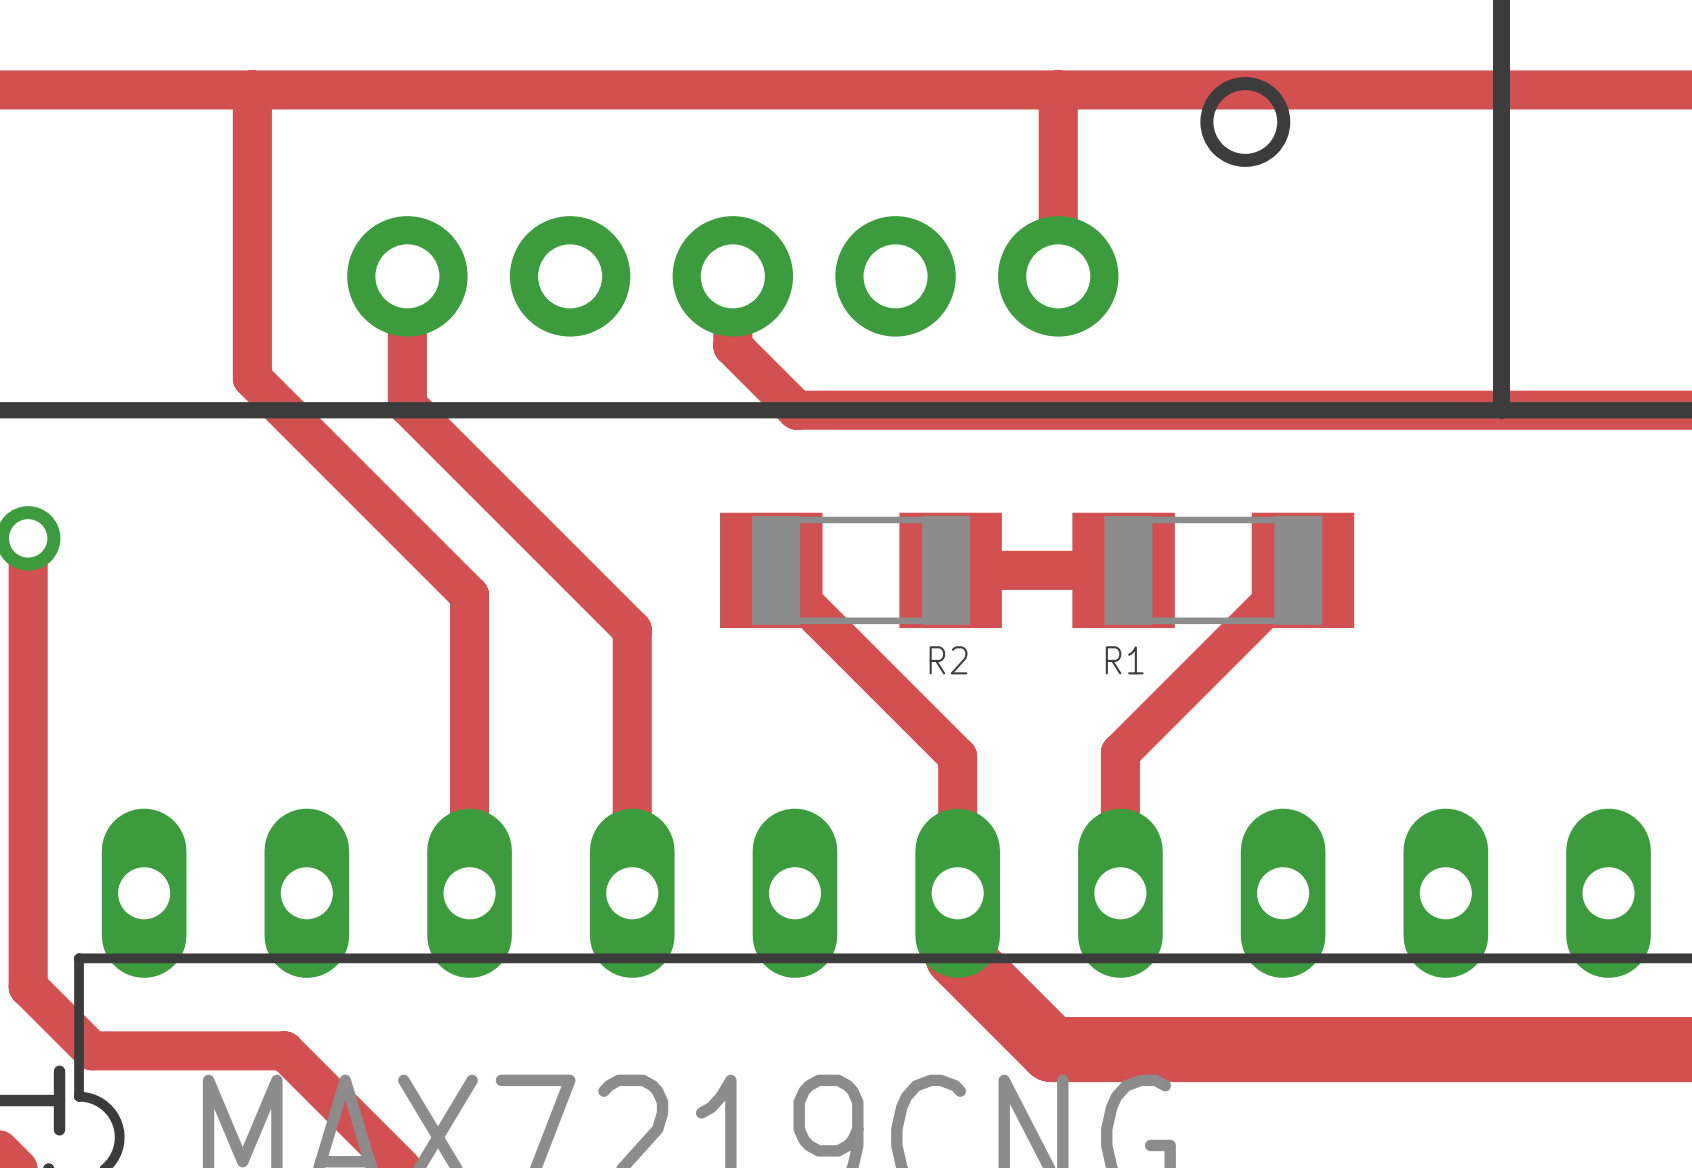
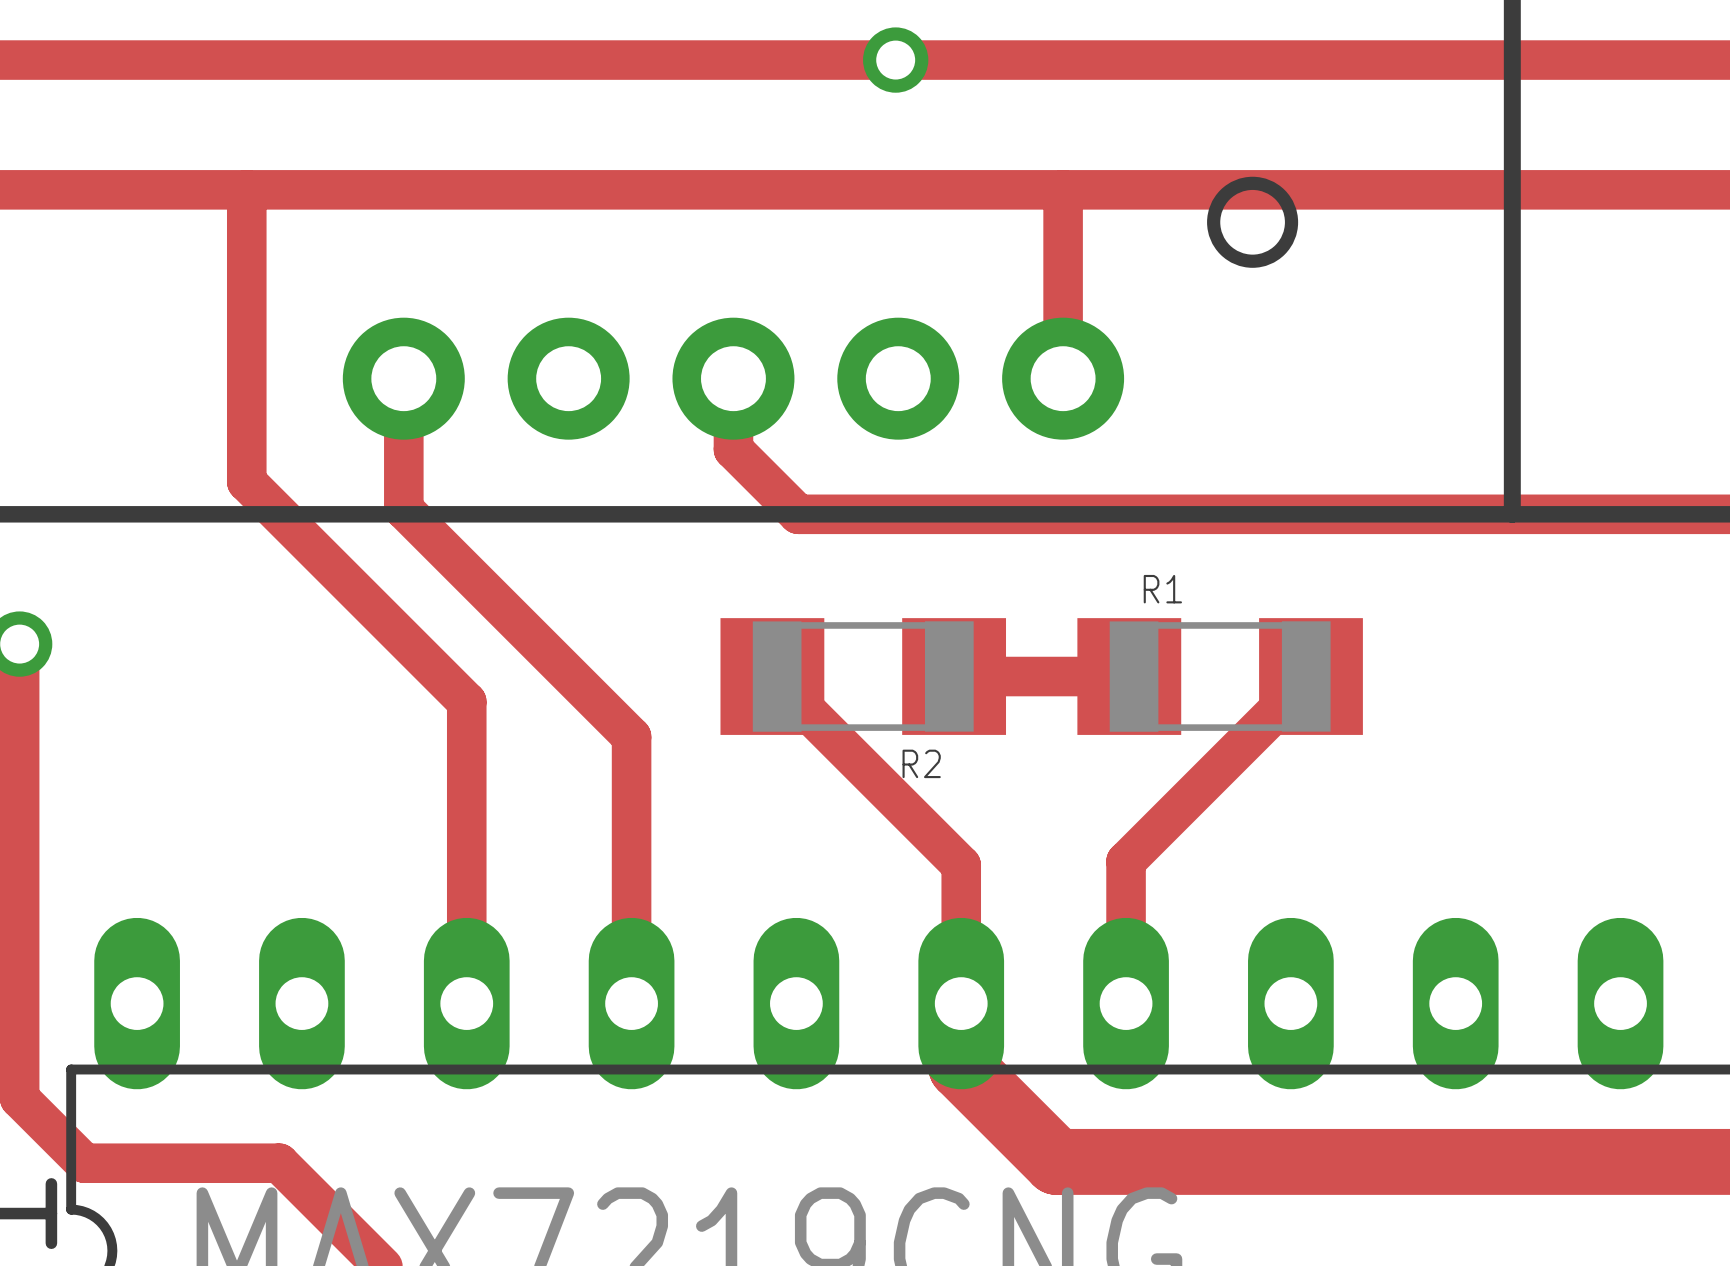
R2 name position: R2 (948, 660) -> R2 (921, 763)
R1 name position: R1 (1124, 660) -> R1 (1162, 589)

